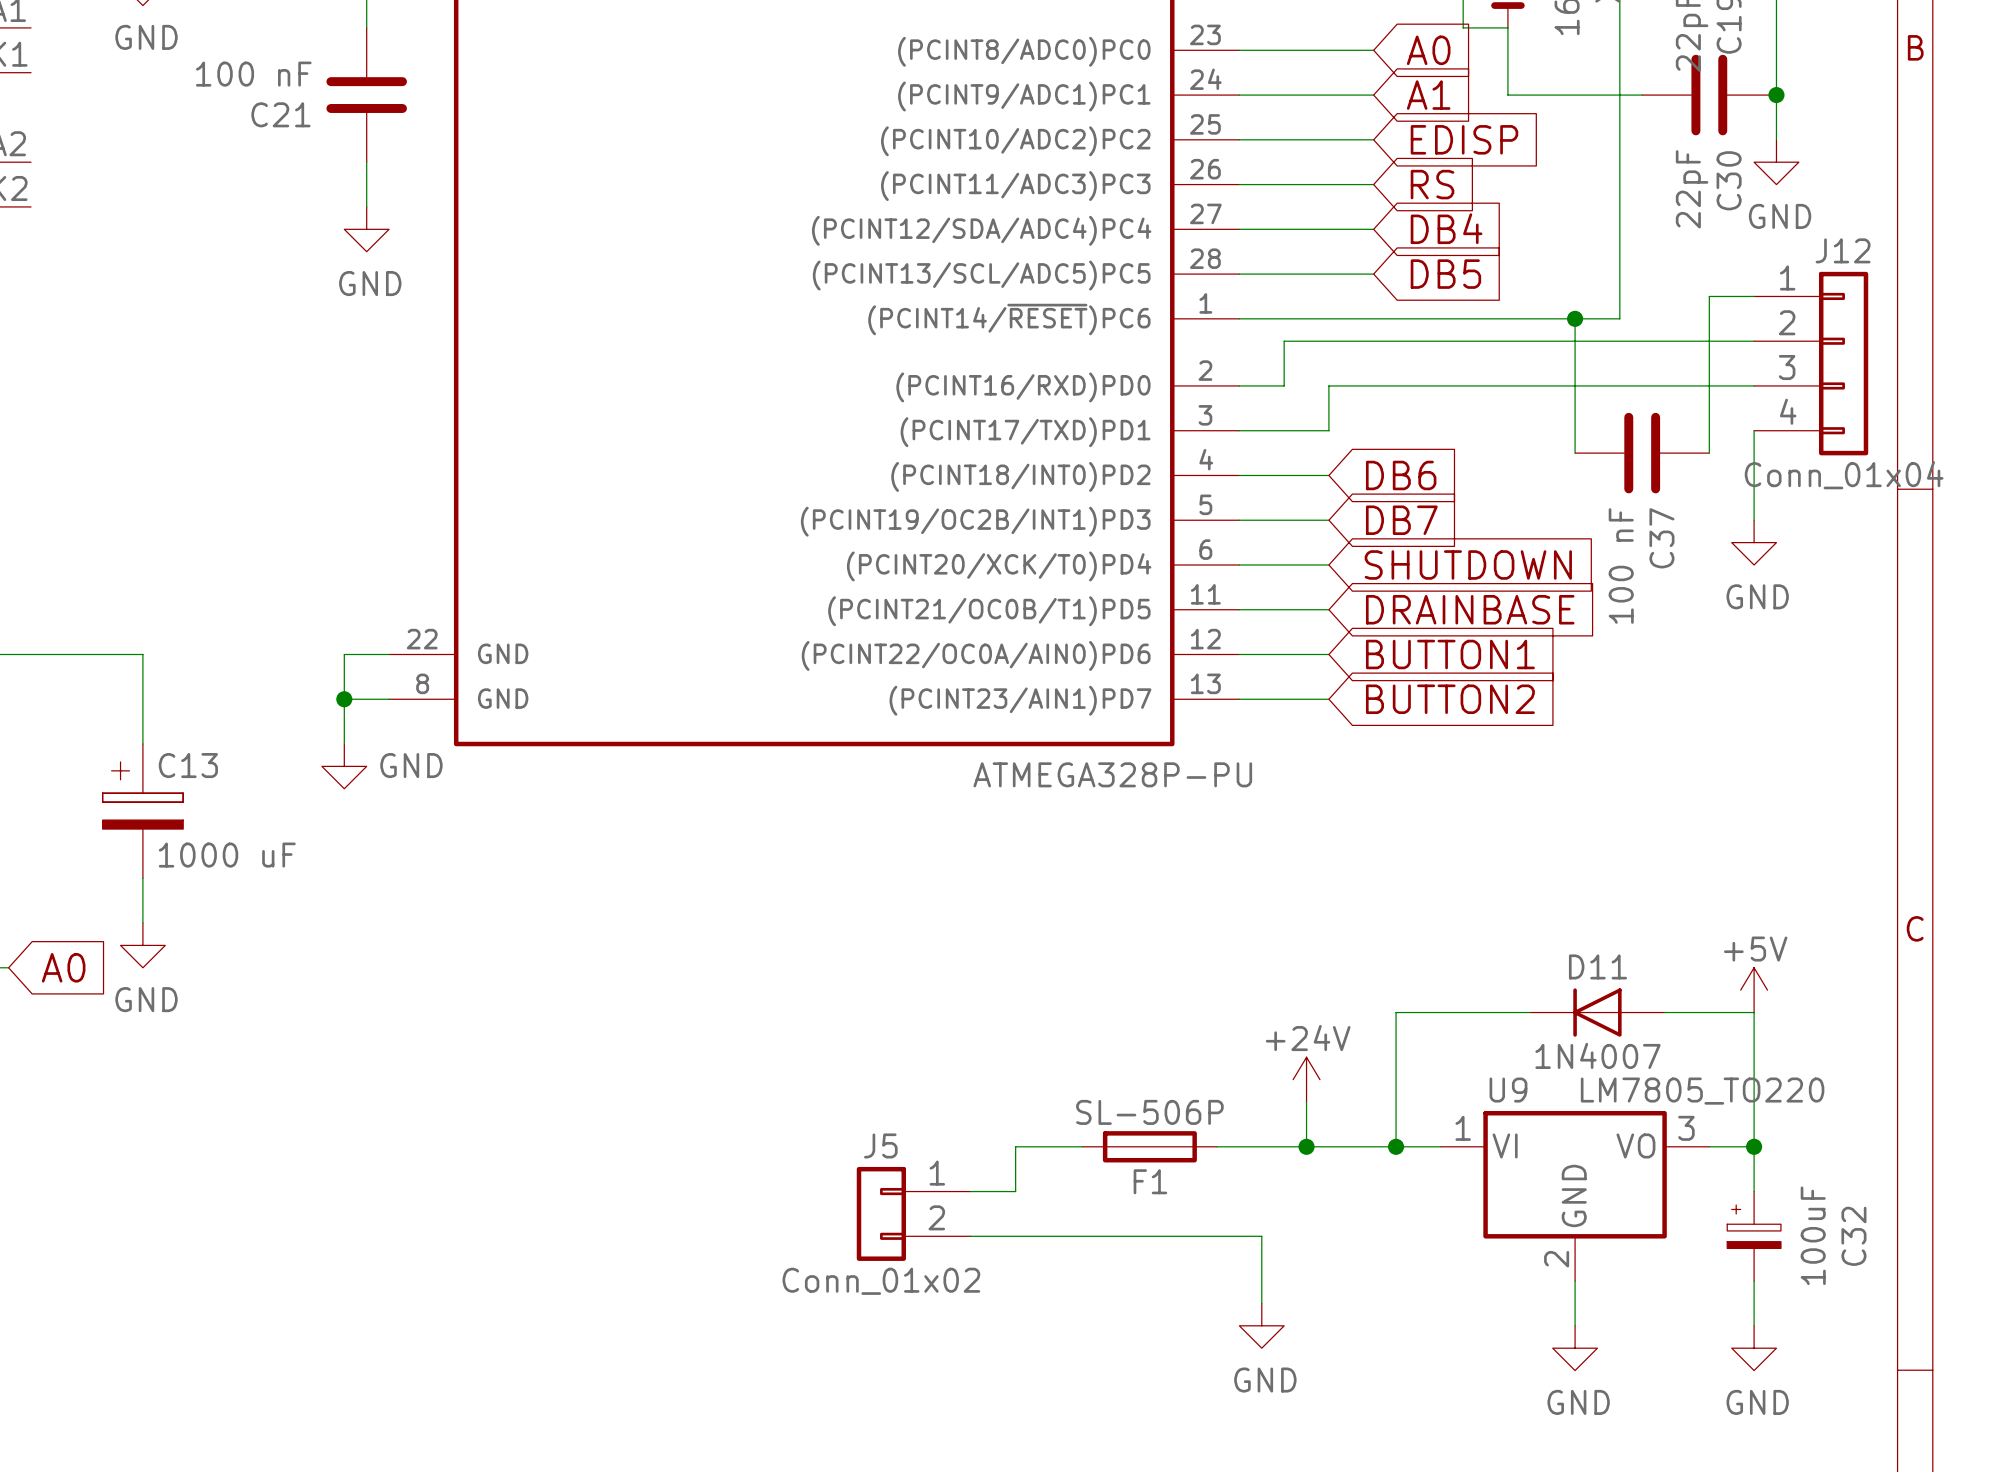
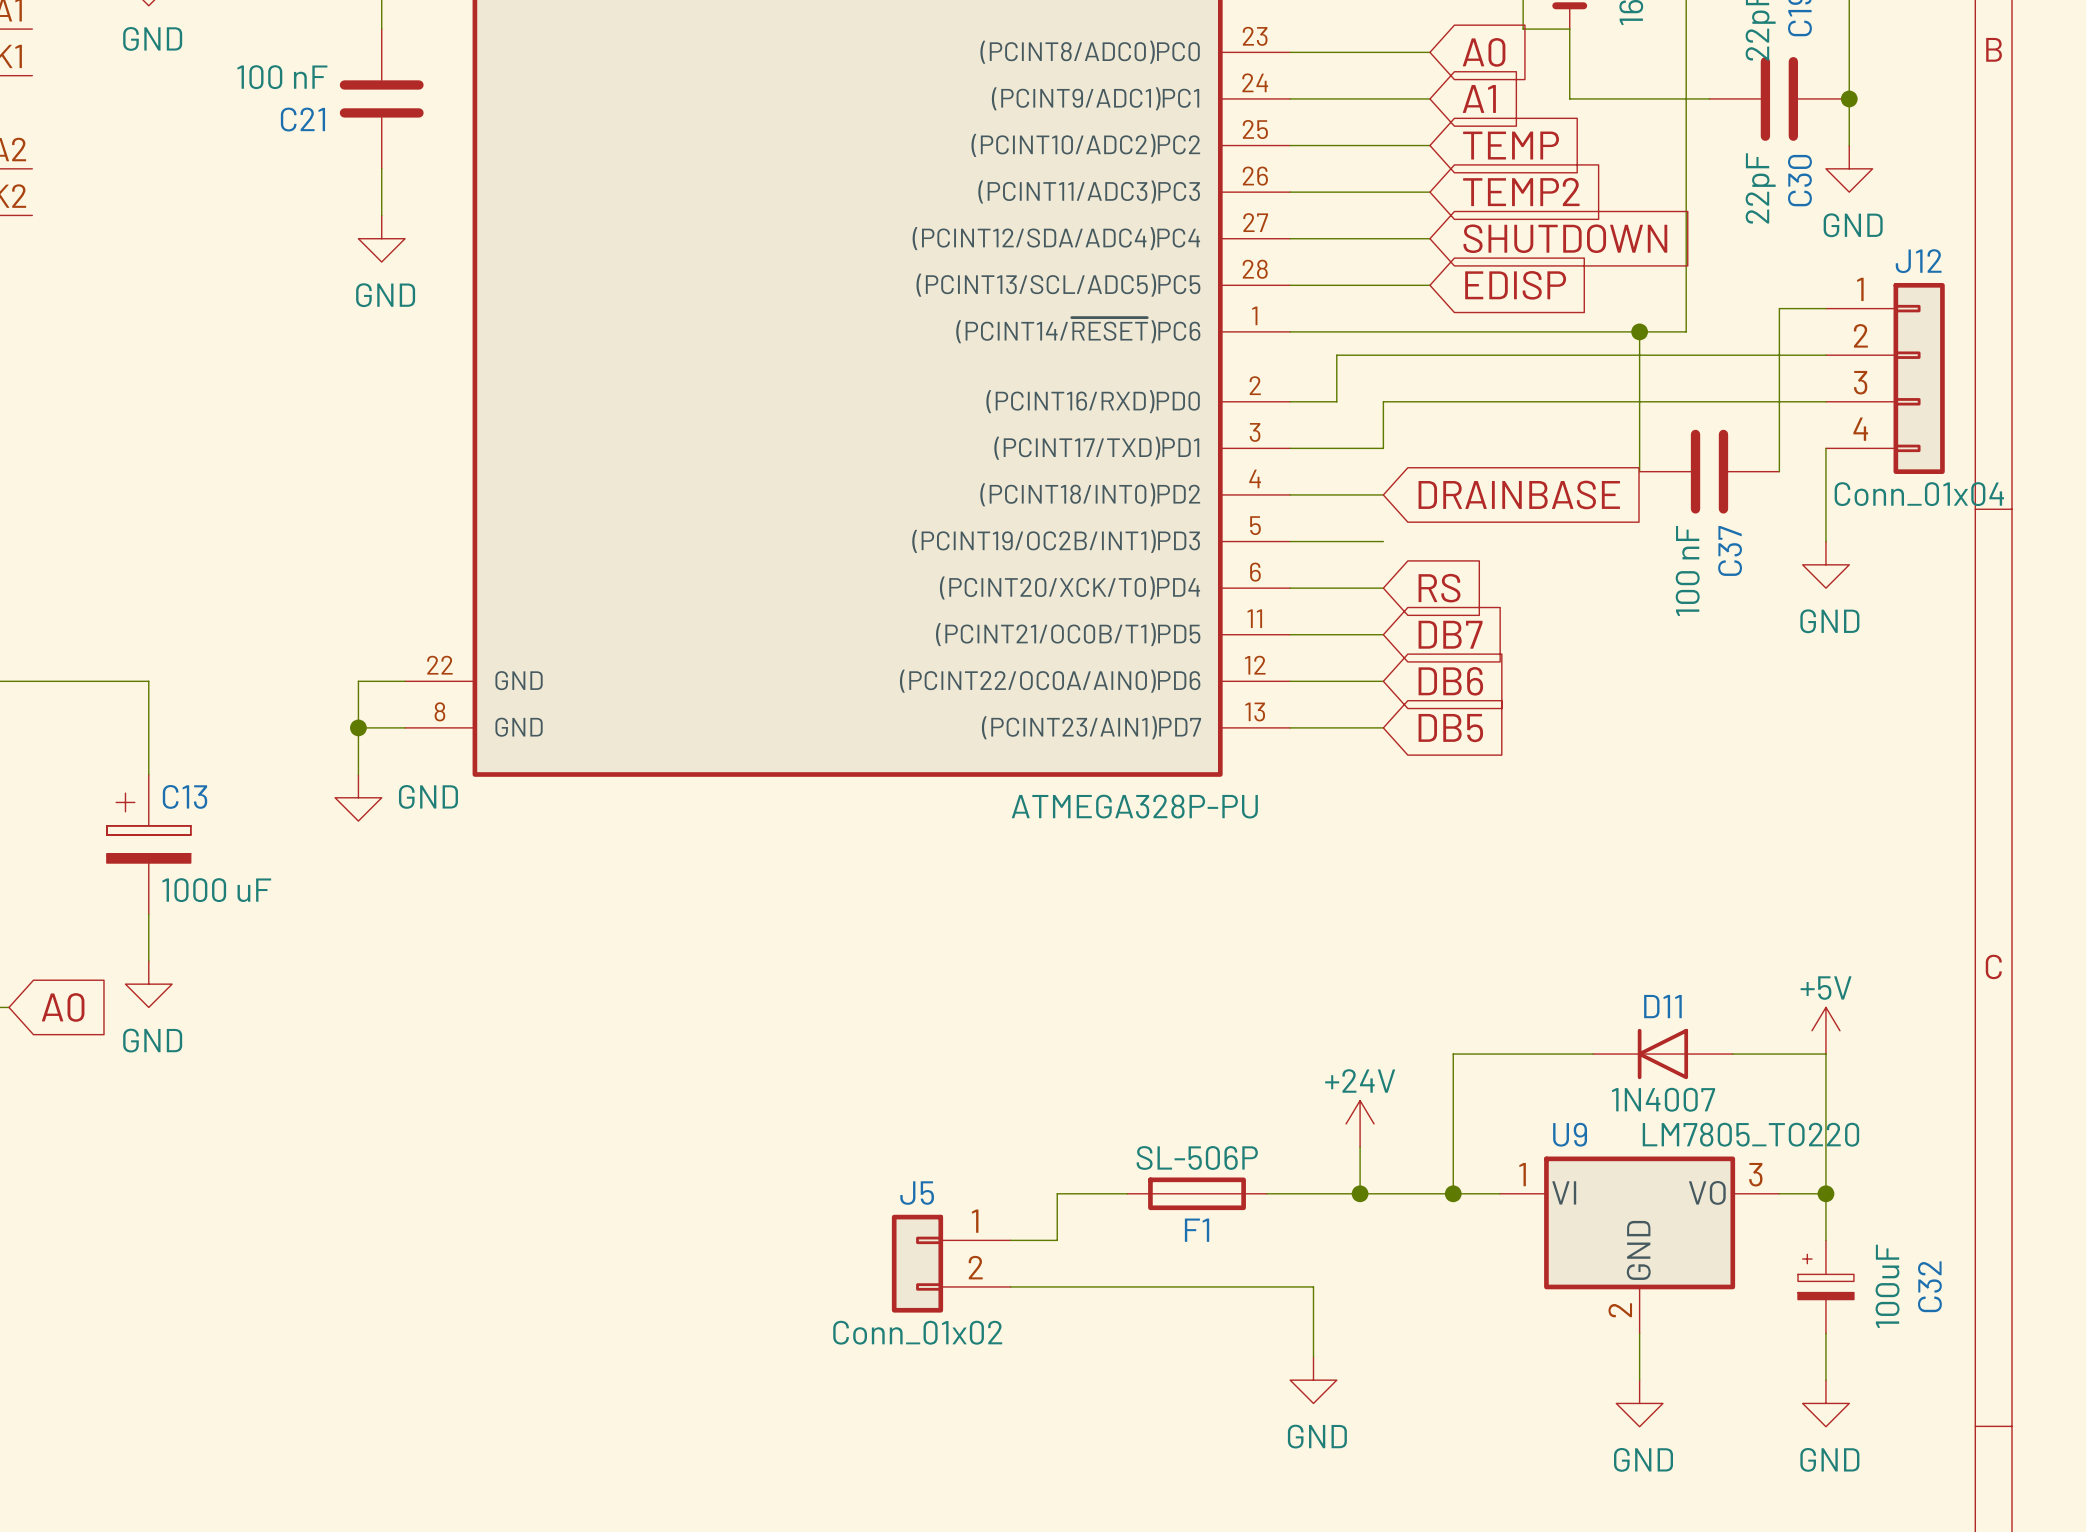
global label: EDISP (1464, 139) -> TEMP (1511, 145)
global label: RS (1432, 184) -> TEMP2 (1521, 191)
global label: DB4 (1446, 228) -> SHUTDOWN (1565, 238)
global label: DB5 (1445, 274) -> EDISP (1515, 285)
global label: DB6 (1401, 475) -> DRAINBASE (1519, 494)
global label: DB7 (1401, 520) -> none
global label: SHUTDOWN (1468, 564) -> RS (1439, 588)
global label: DRAINBASE (1470, 609) -> DB7 (1450, 634)
global label: BUTTON1 (1450, 654) -> DB6 (1450, 681)
global label: BUTTON2 (1450, 699) -> DB5 (1450, 728)

